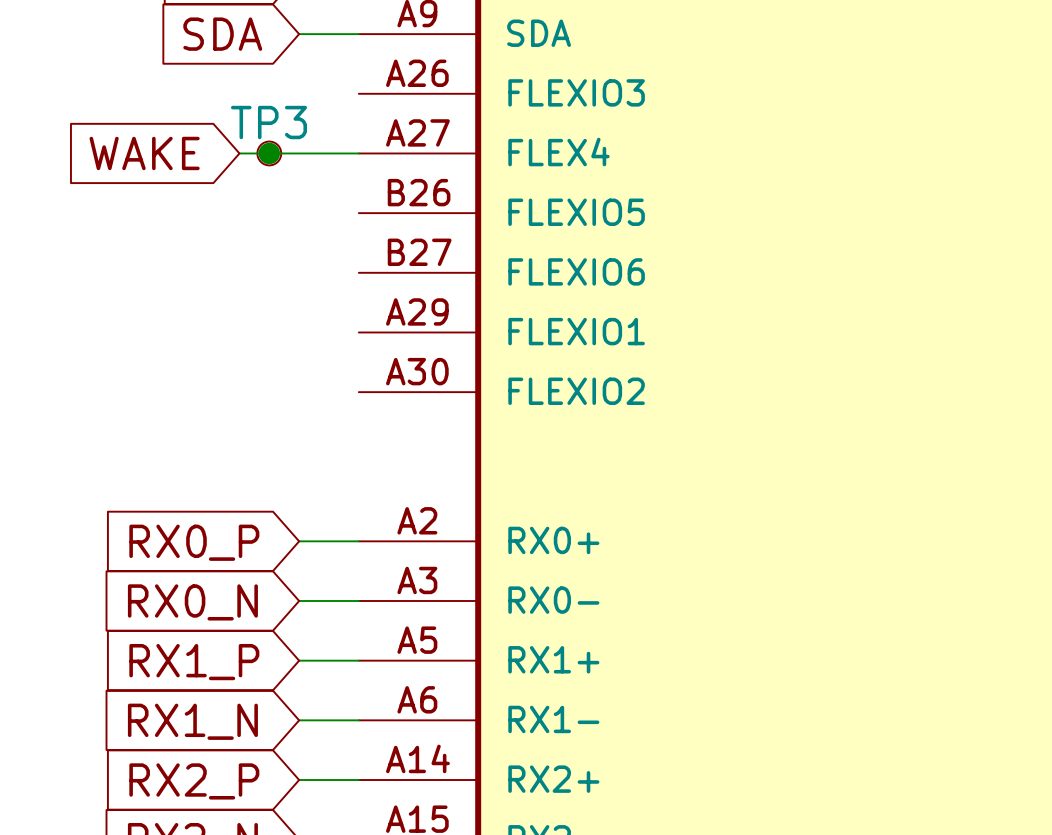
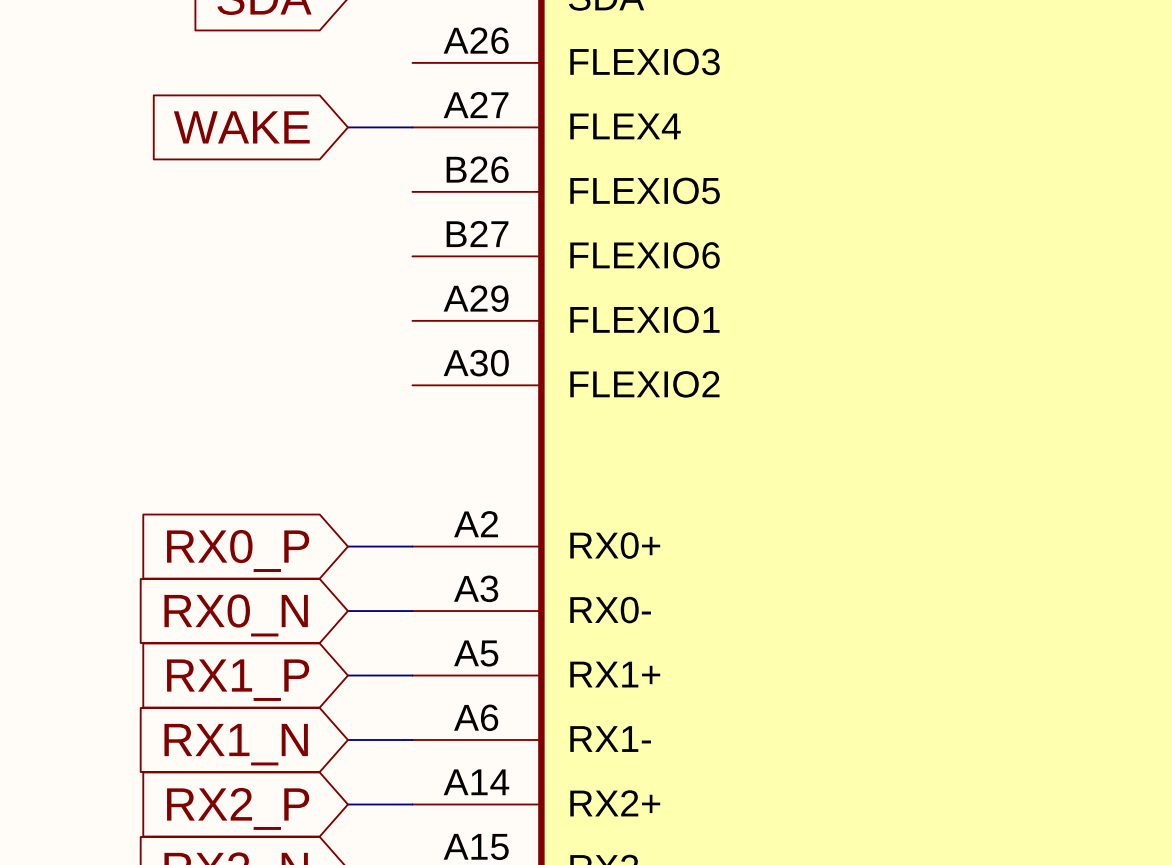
global label position: WAKE (144, 153) -> WAKE (241, 127)
wire: (239, 153) (299, 153) -> none
junction: (269, 153) -> none
TP3: (269, 153) -> none

